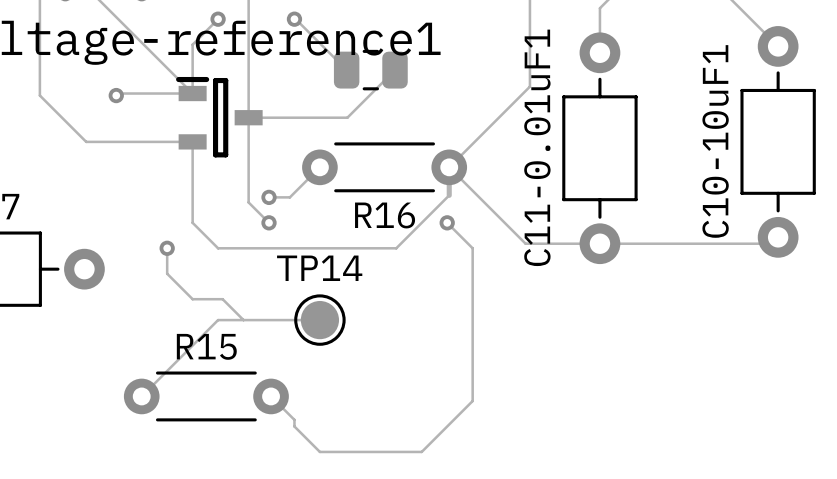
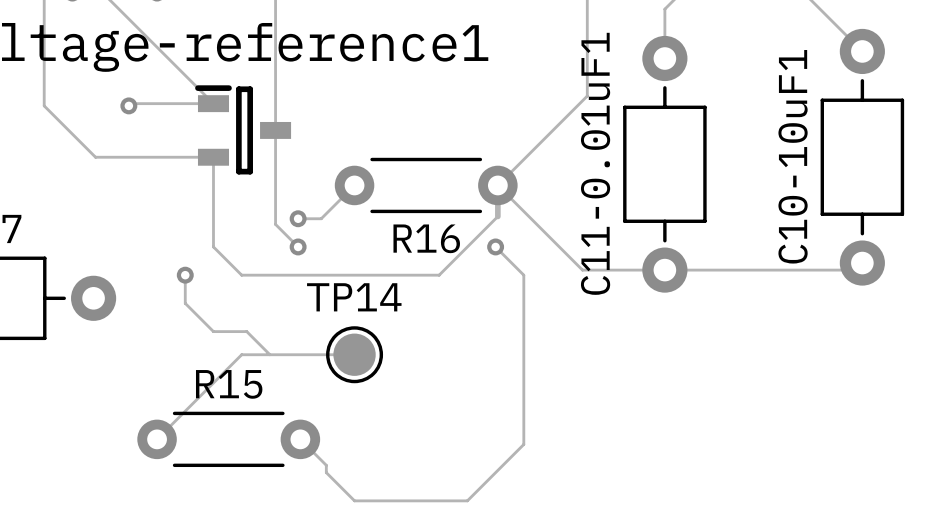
track: (218, 19) (192, 44) (192, 93) -> none
via: (218, 19) -> none
track: (294, 19) (346, 70) -> none
via: (294, 19) -> none
part: (370, 70) -> none
track: (395, 70) (347, 117) (248, 117) -> none

